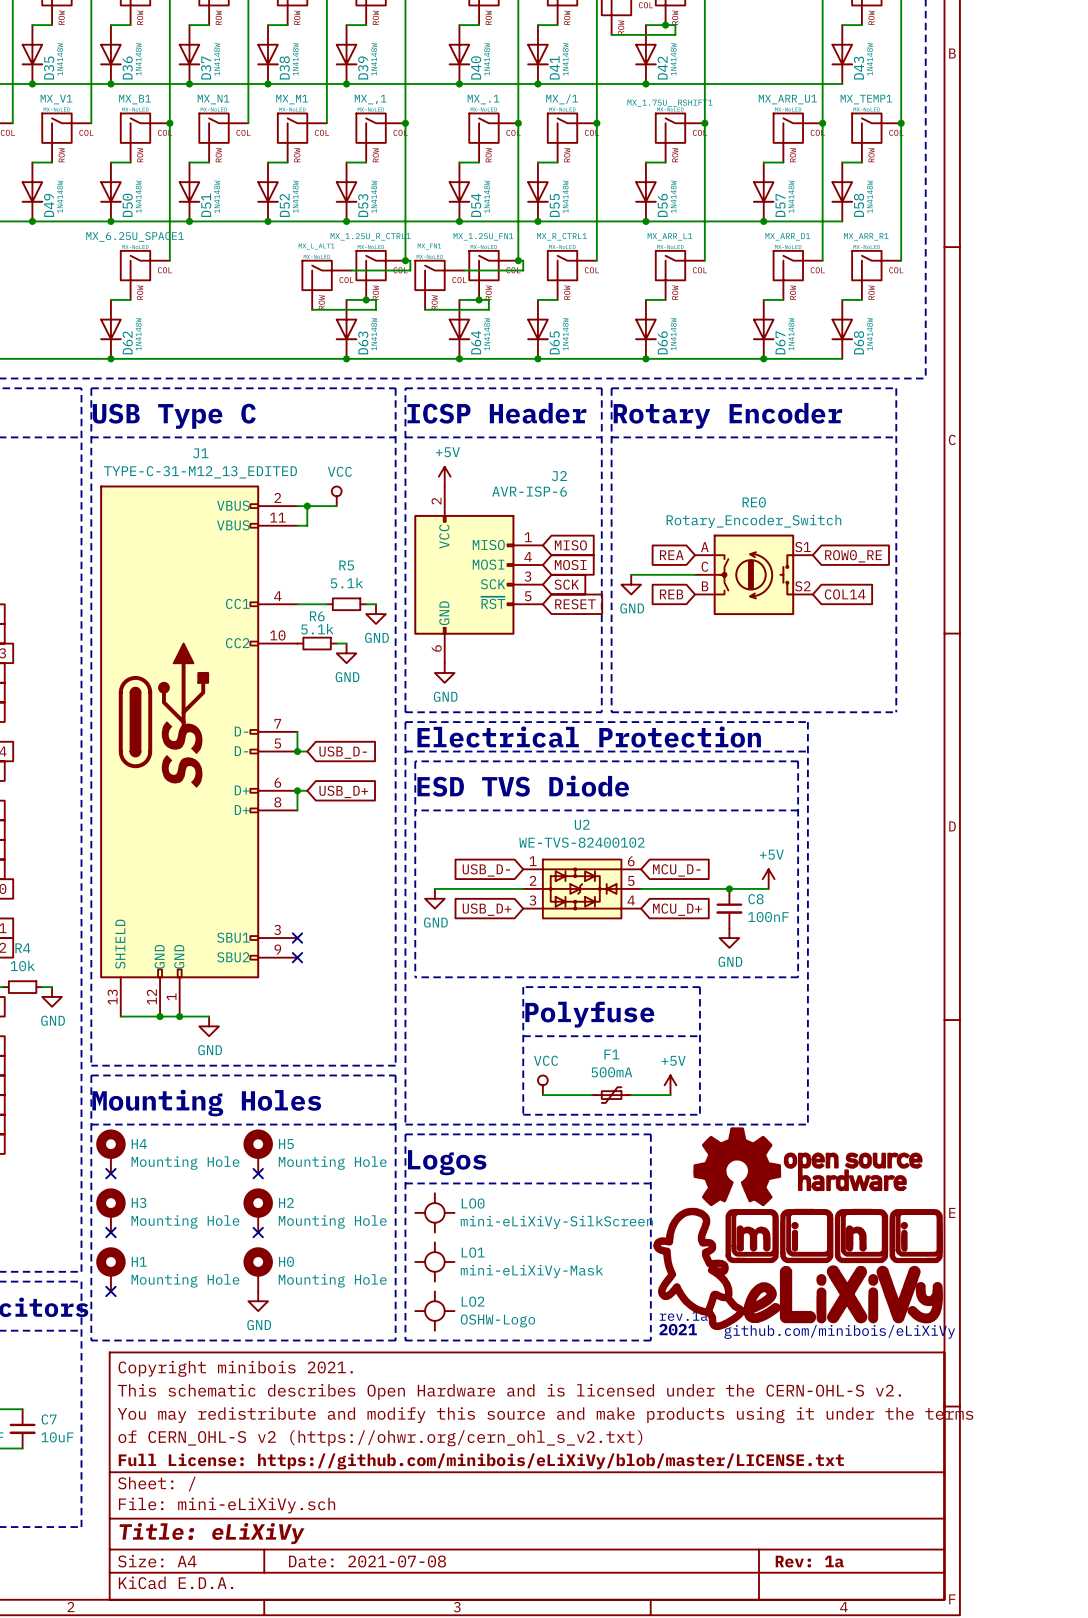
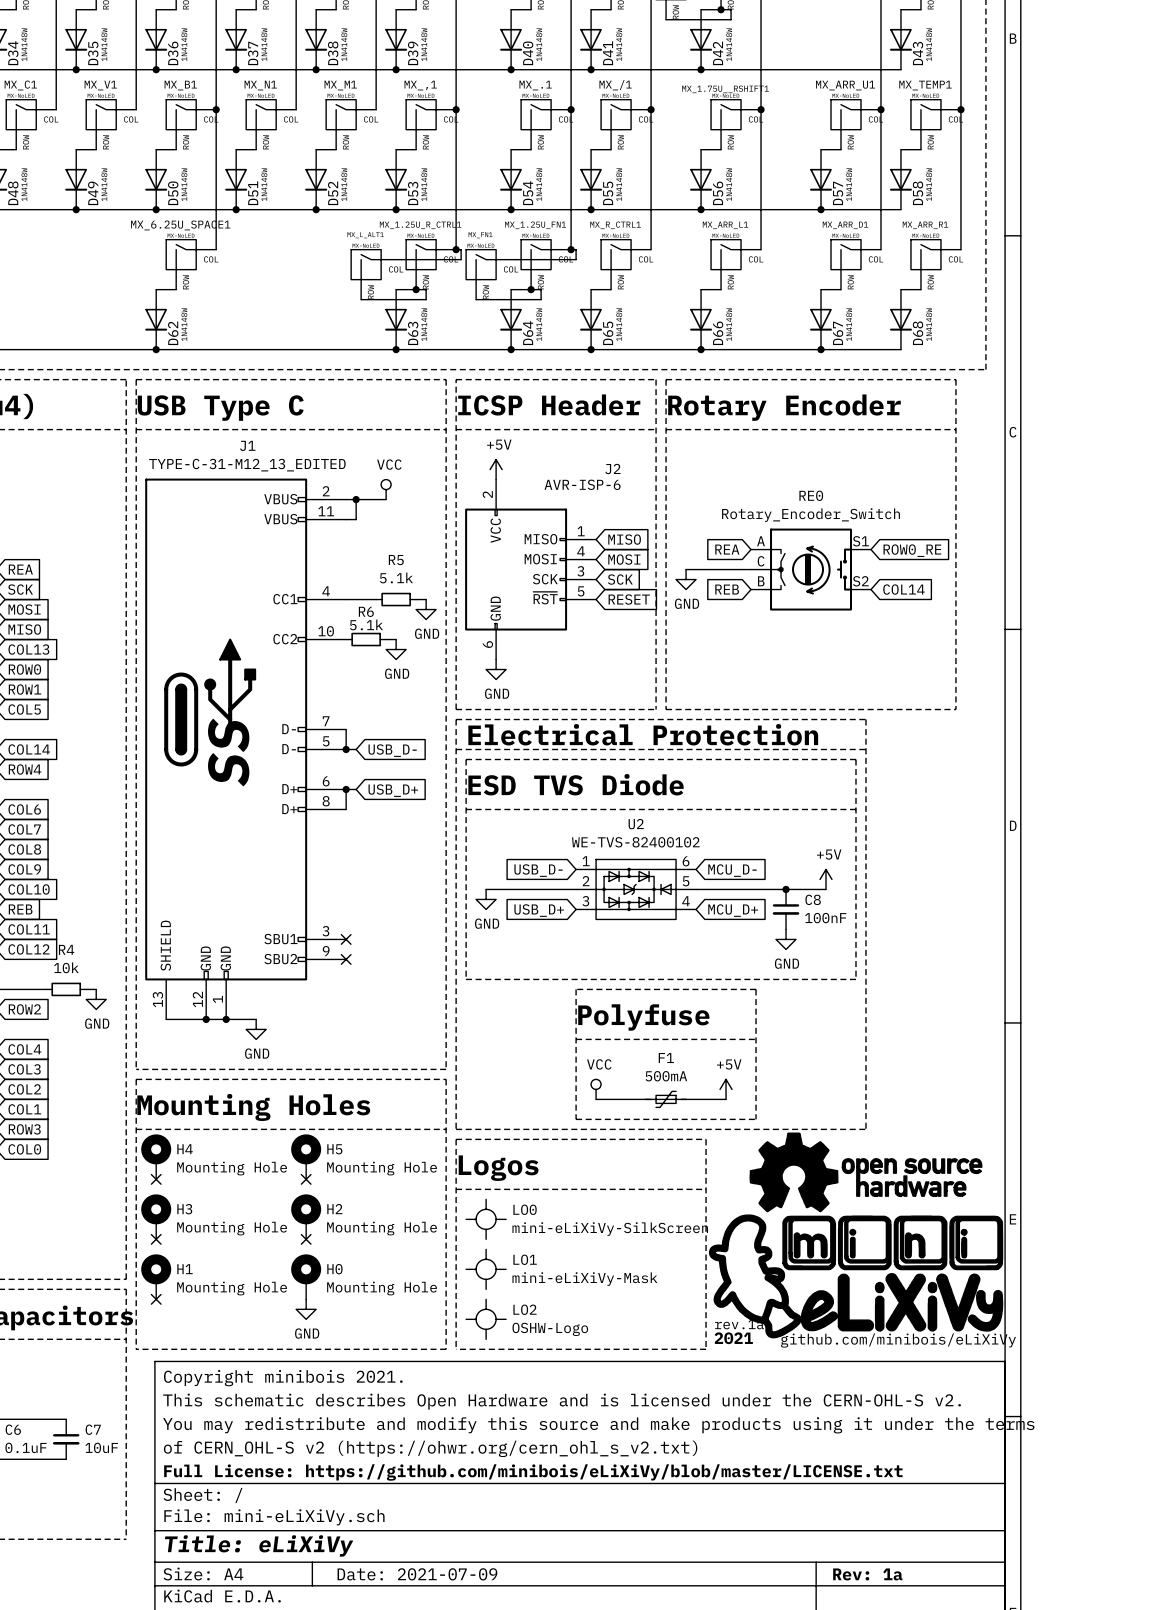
title block: Date: 2021-07-08 (367, 1561) -> Date: 2021-07-09 (417, 1574)

